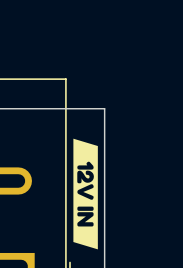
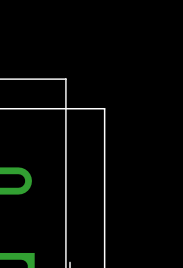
drawing: [73, 138, 98, 250] -> none

